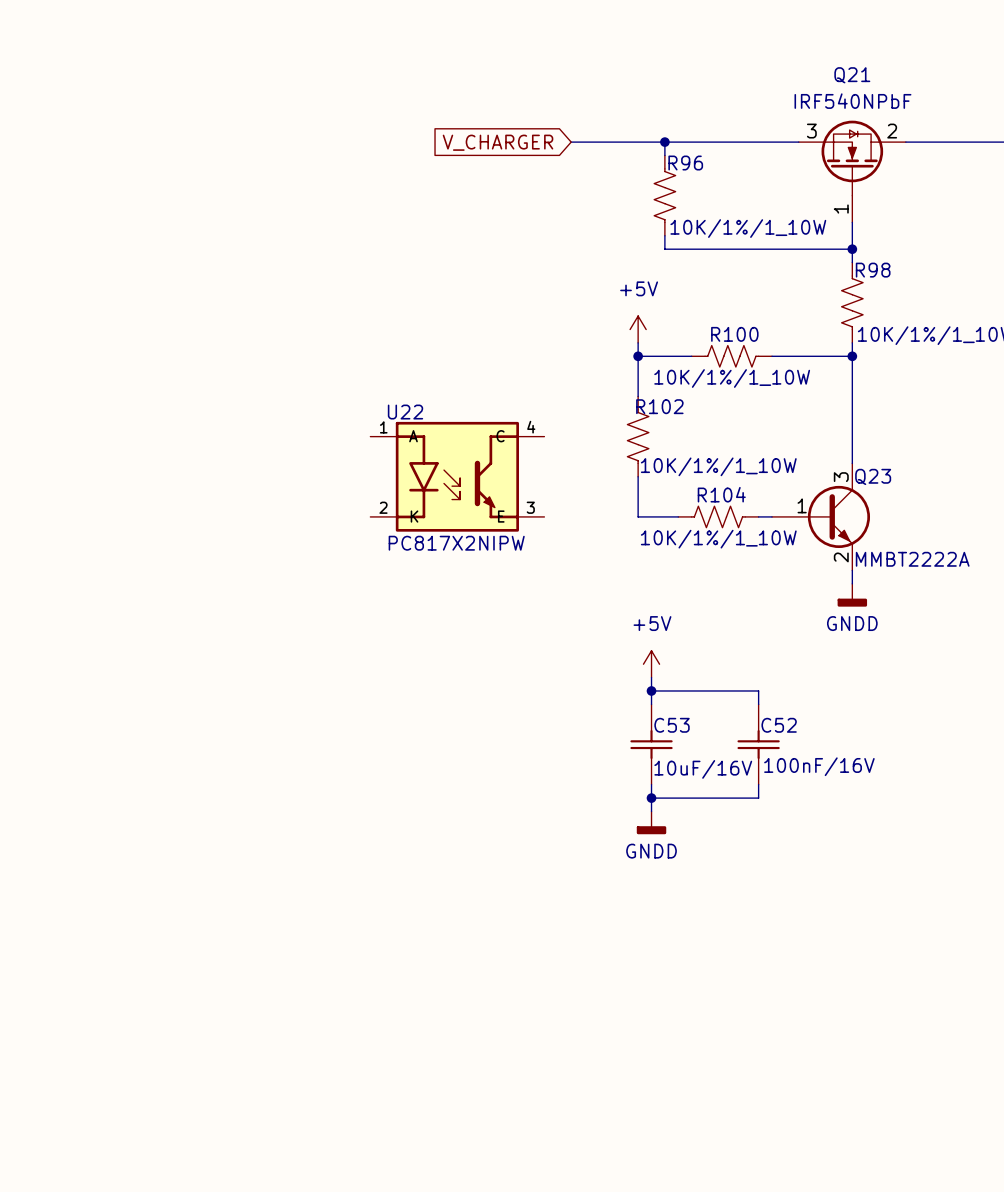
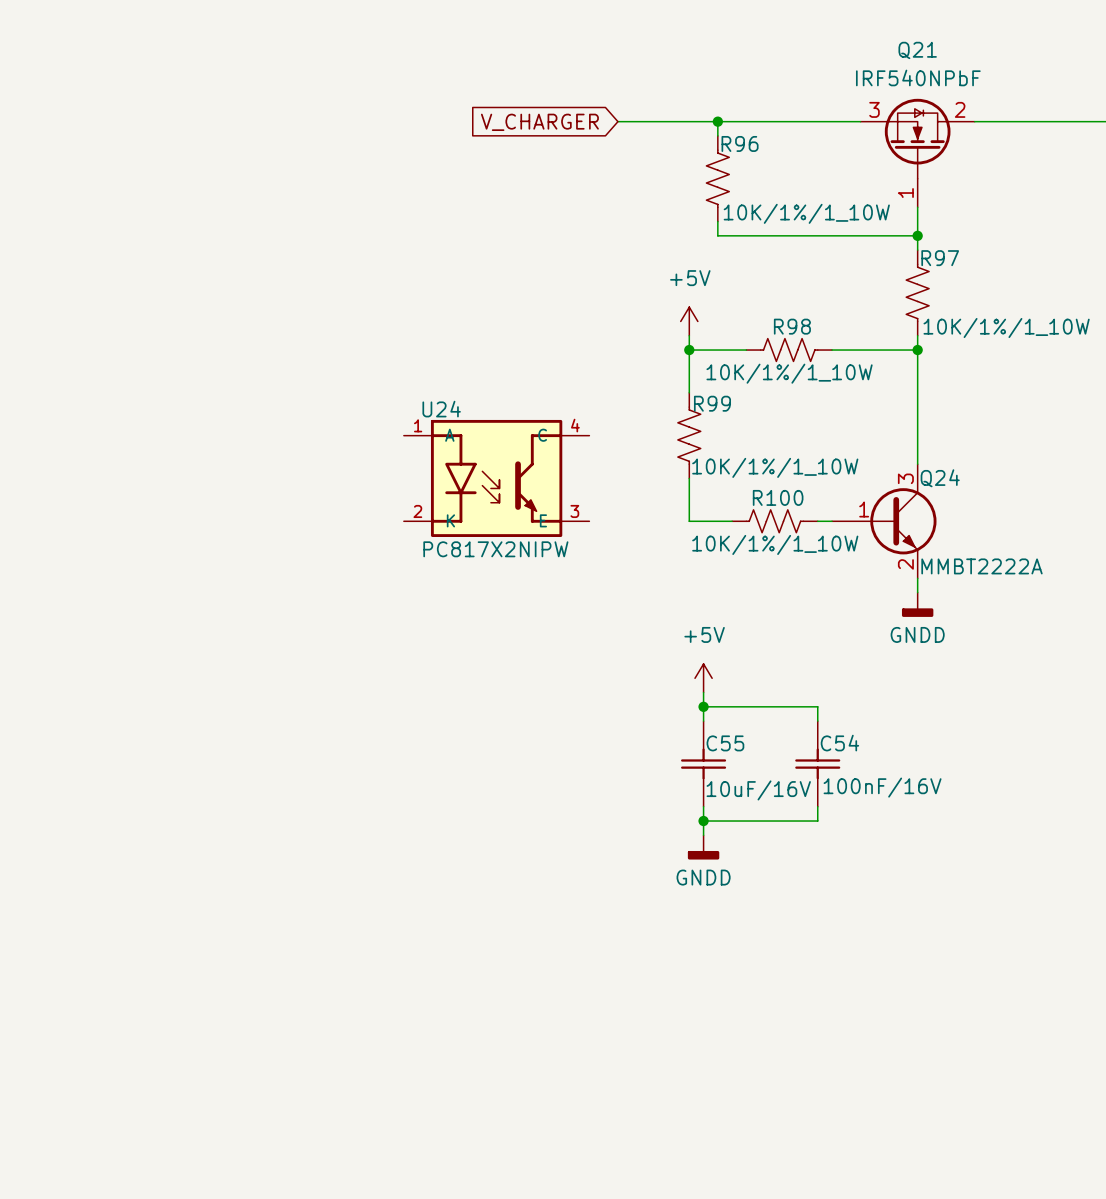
R98 name: R98 (873, 270) -> R97 (940, 258)
R100 name: R100 (734, 334) -> R98 (792, 326)
R102 name: R102 (659, 406) -> R99 (712, 403)
U22 name: U22 (405, 412) -> U24 (441, 409)
Q23 name: Q23 (873, 476) -> Q24 (940, 478)
R104 name: R104 (721, 494) -> R100 (778, 497)
C53 name: C53 (672, 725) -> C55 (725, 743)
C52 name: C52 (779, 725) -> C54 (839, 743)

